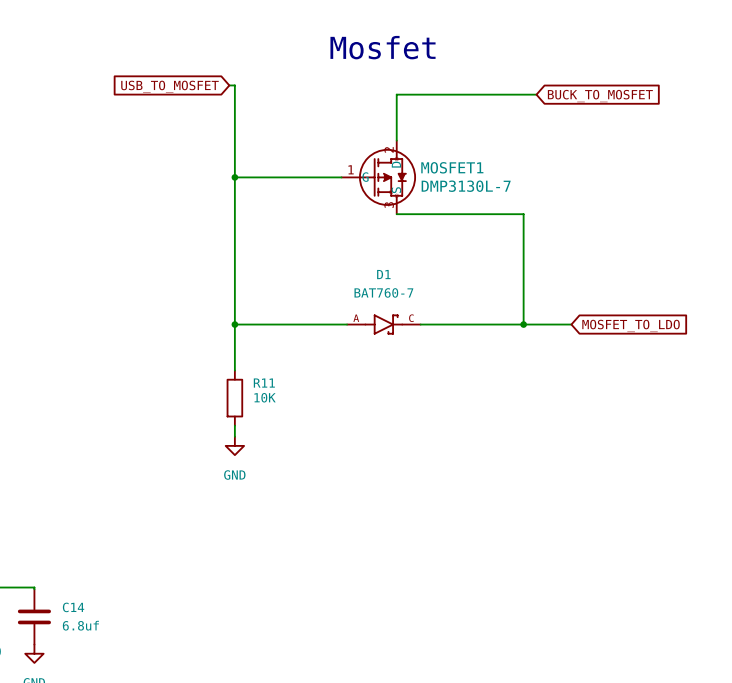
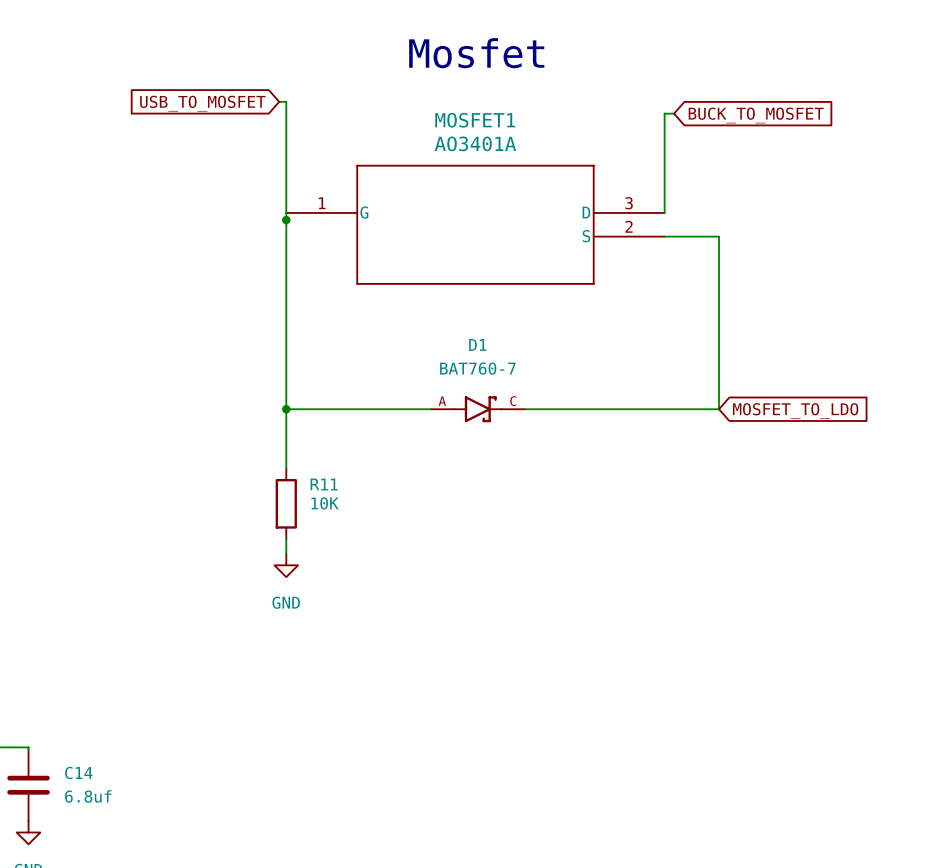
wire: (529, 94) (396, 94) (396, 140) -> (664, 113) (664, 212)
MOSFET1 symbol: [341, 140, 417, 215] -> [286, 165, 665, 285]
MOSFET1 name position: MOSFET1 (452, 167) -> MOSFET1 (475, 120)
wire: (234, 177) (341, 177) -> none
MOSFET1 value: DMP3130L-7 (466, 186) -> AO3401A (475, 143)
wire: none -> (664, 236) (719, 236) (719, 409)
wire: (396, 214) (523, 214) (523, 324) -> none
junction: (523, 324) -> none

